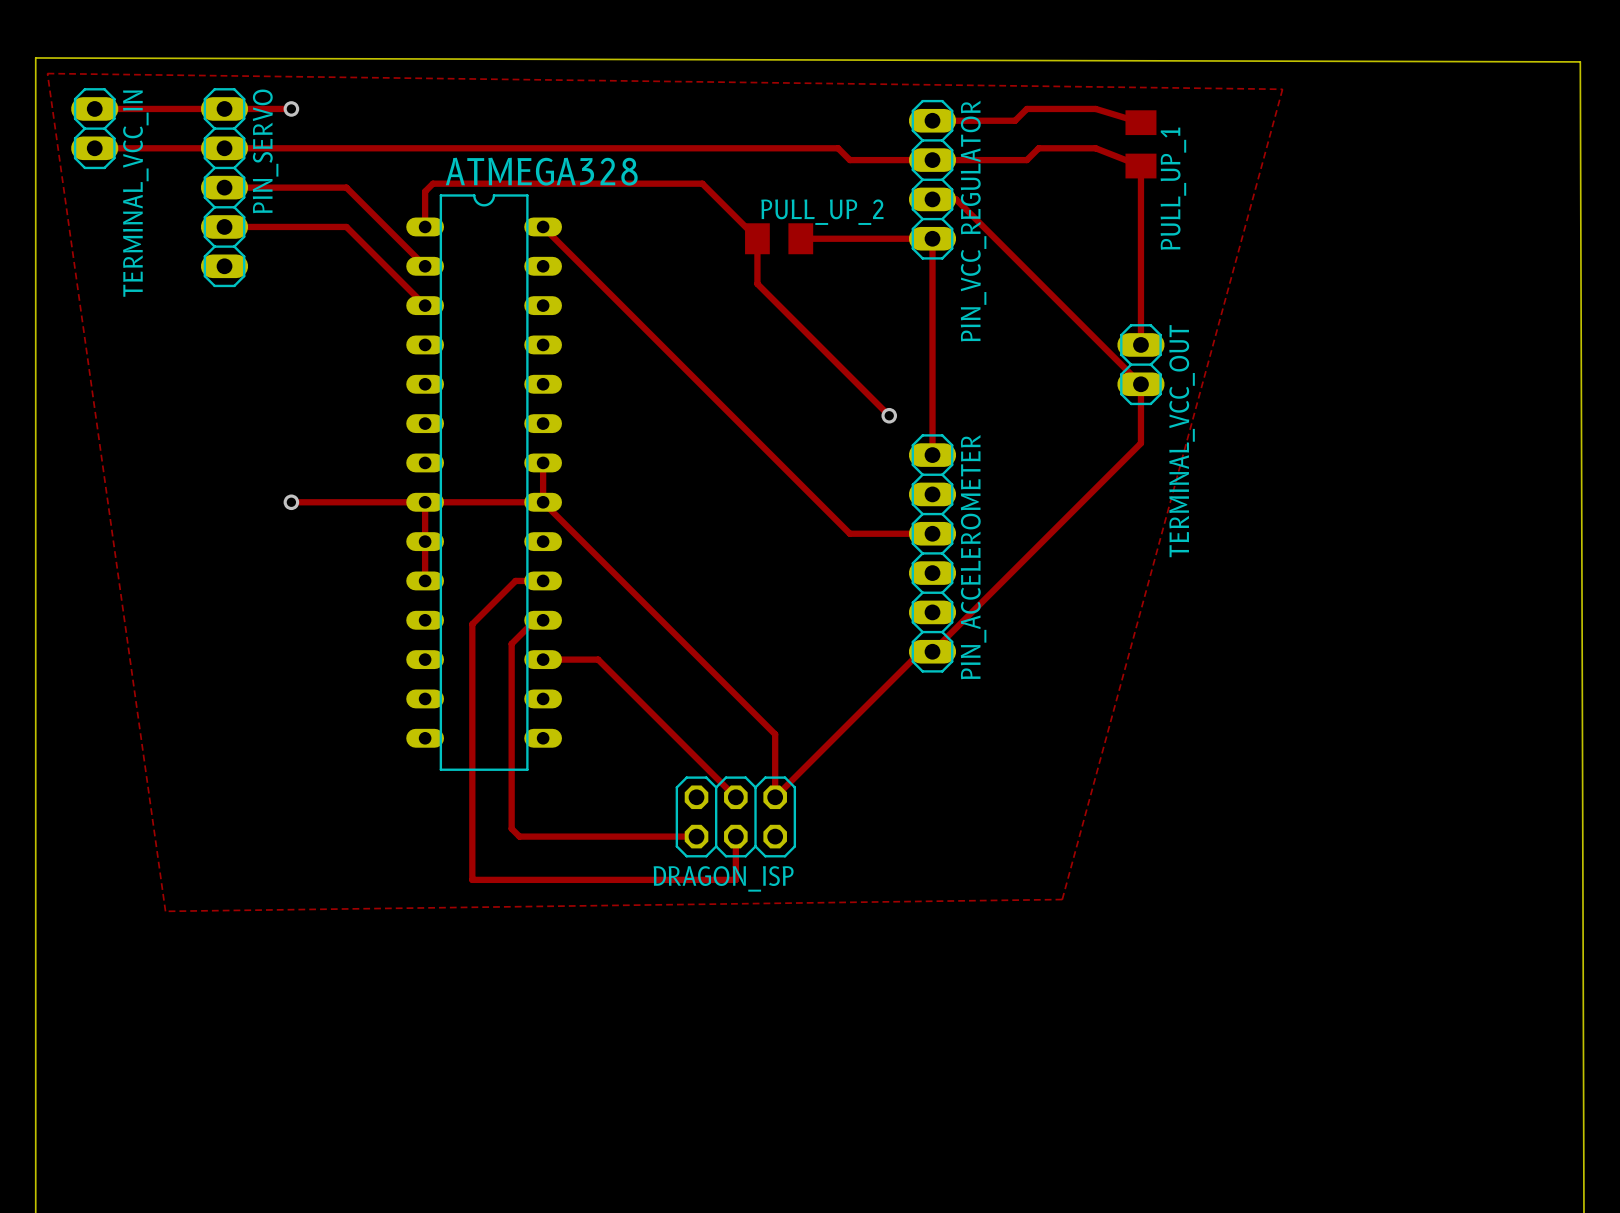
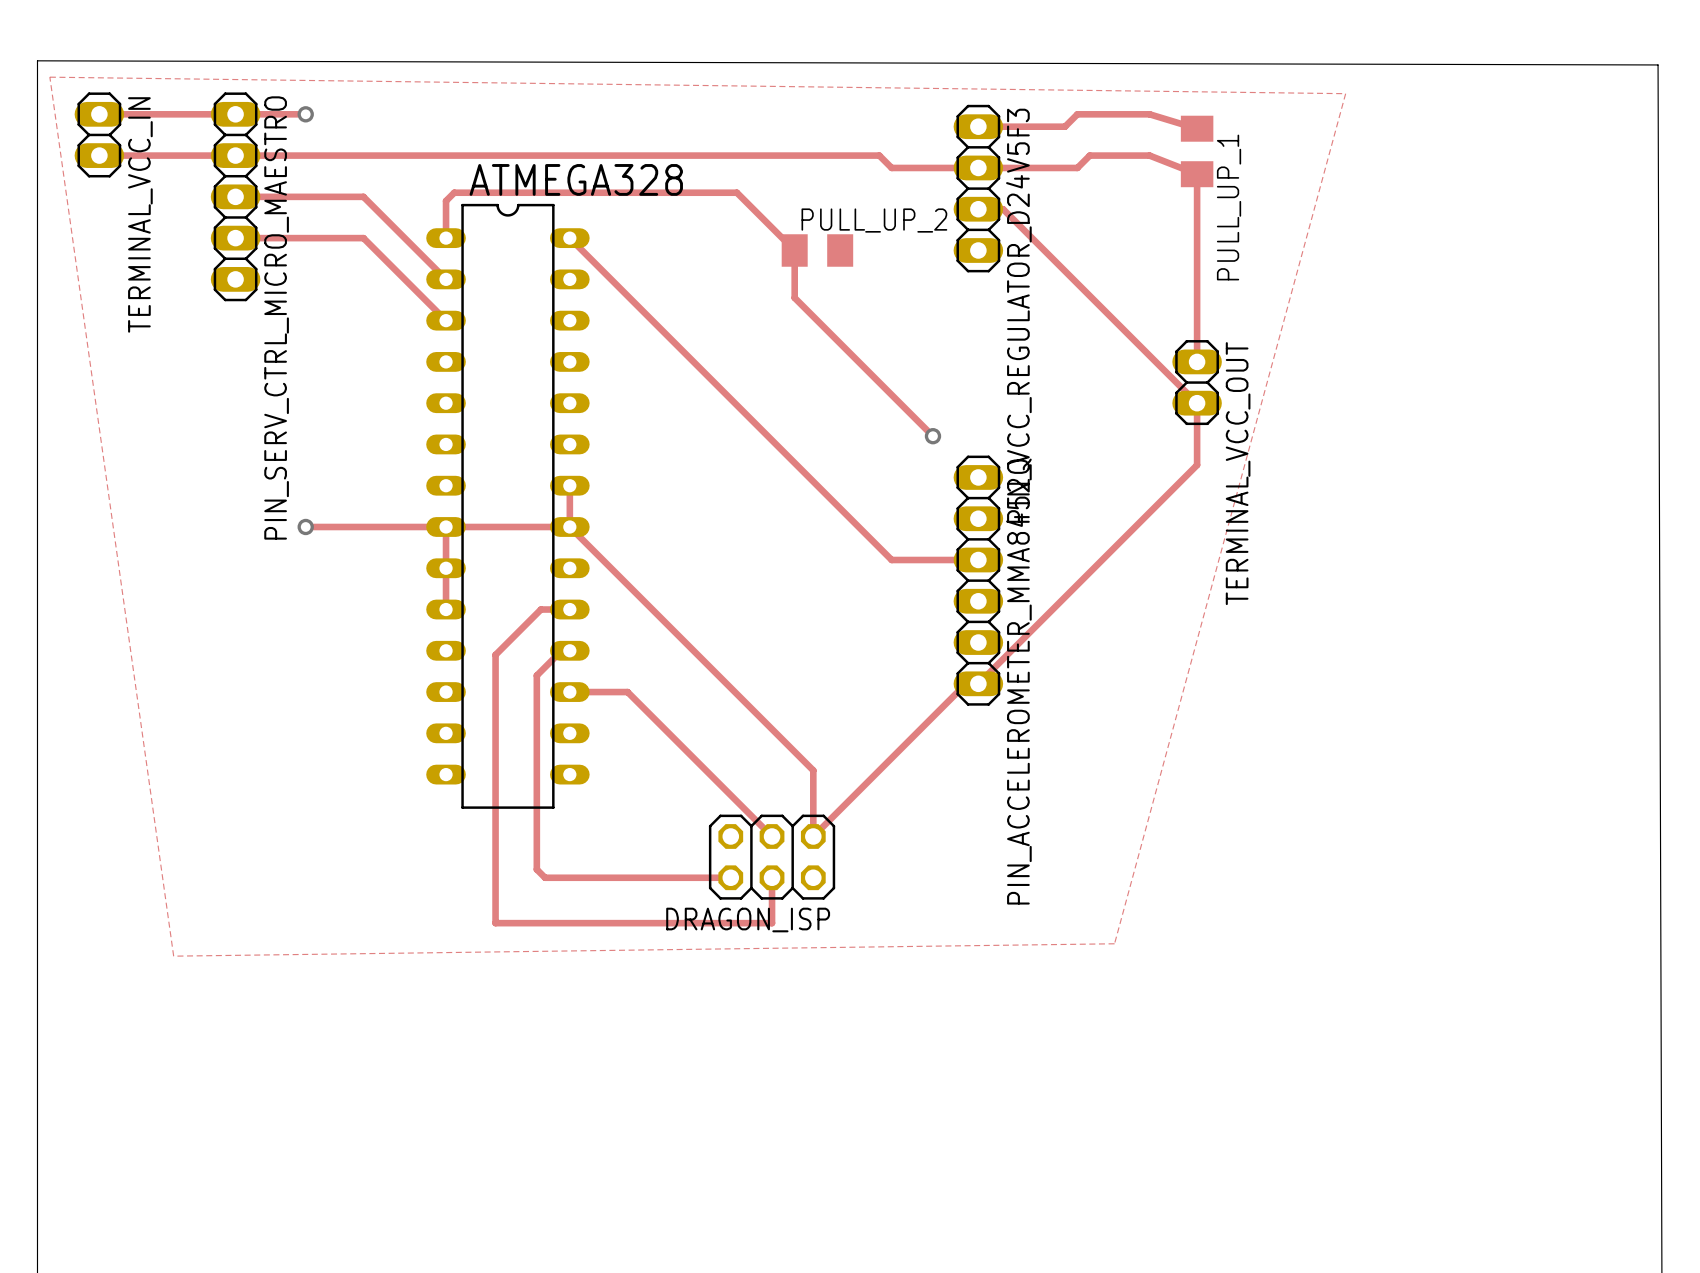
PIN_SERVO name: PIN_SERVO (265, 151) -> PIN_SERV_CTRL_MICRO_MAESTRO (276, 317)
PIN_VCC_REGULATOR name: PIN_VCC_REGULATOR (973, 221) -> PIN_VCC_REGULATOR_D24V5F3 (1018, 315)
track: (800, 238) (932, 238) (932, 455) -> none
PIN_ACCELEROMETER name: PIN_ACCELEROMETER (973, 557) -> PIN_ACCELEROMETER_MMA8452Q (1018, 681)

